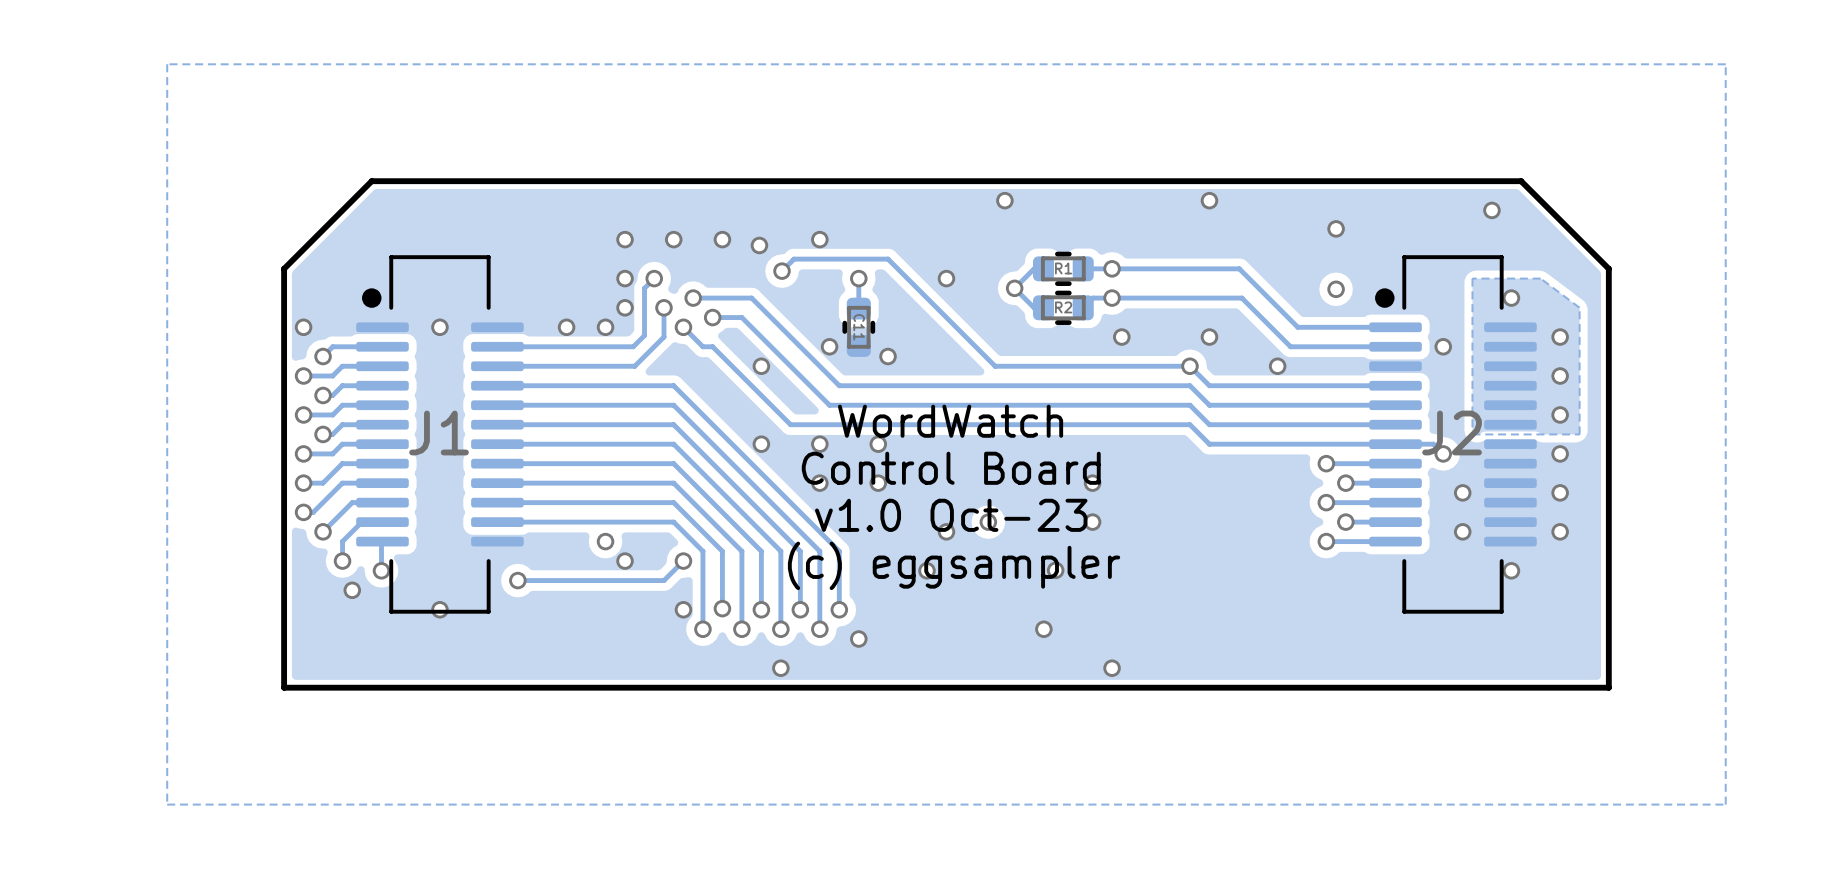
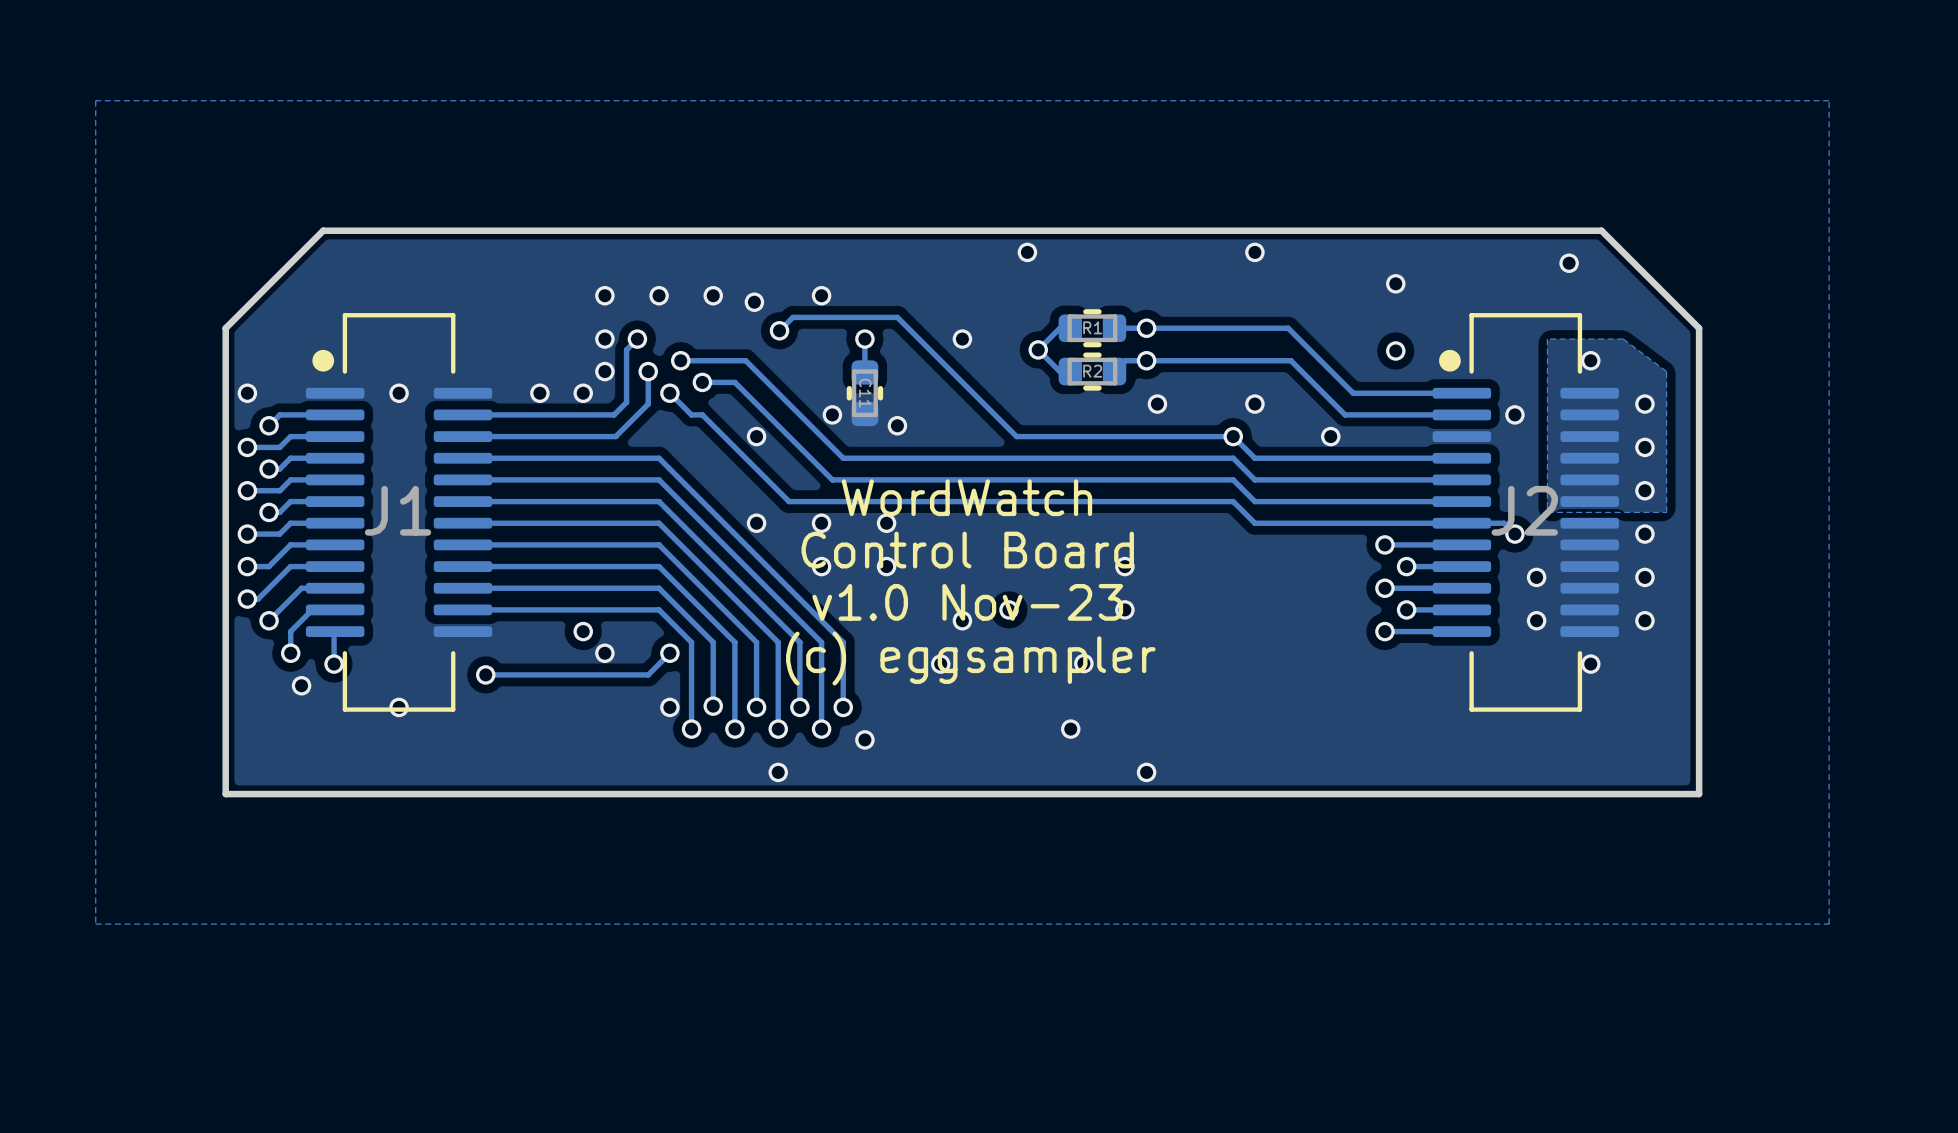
text: v1.0 Oct-23 (951, 515) -> v1.0 Nov-23 (967, 602)

